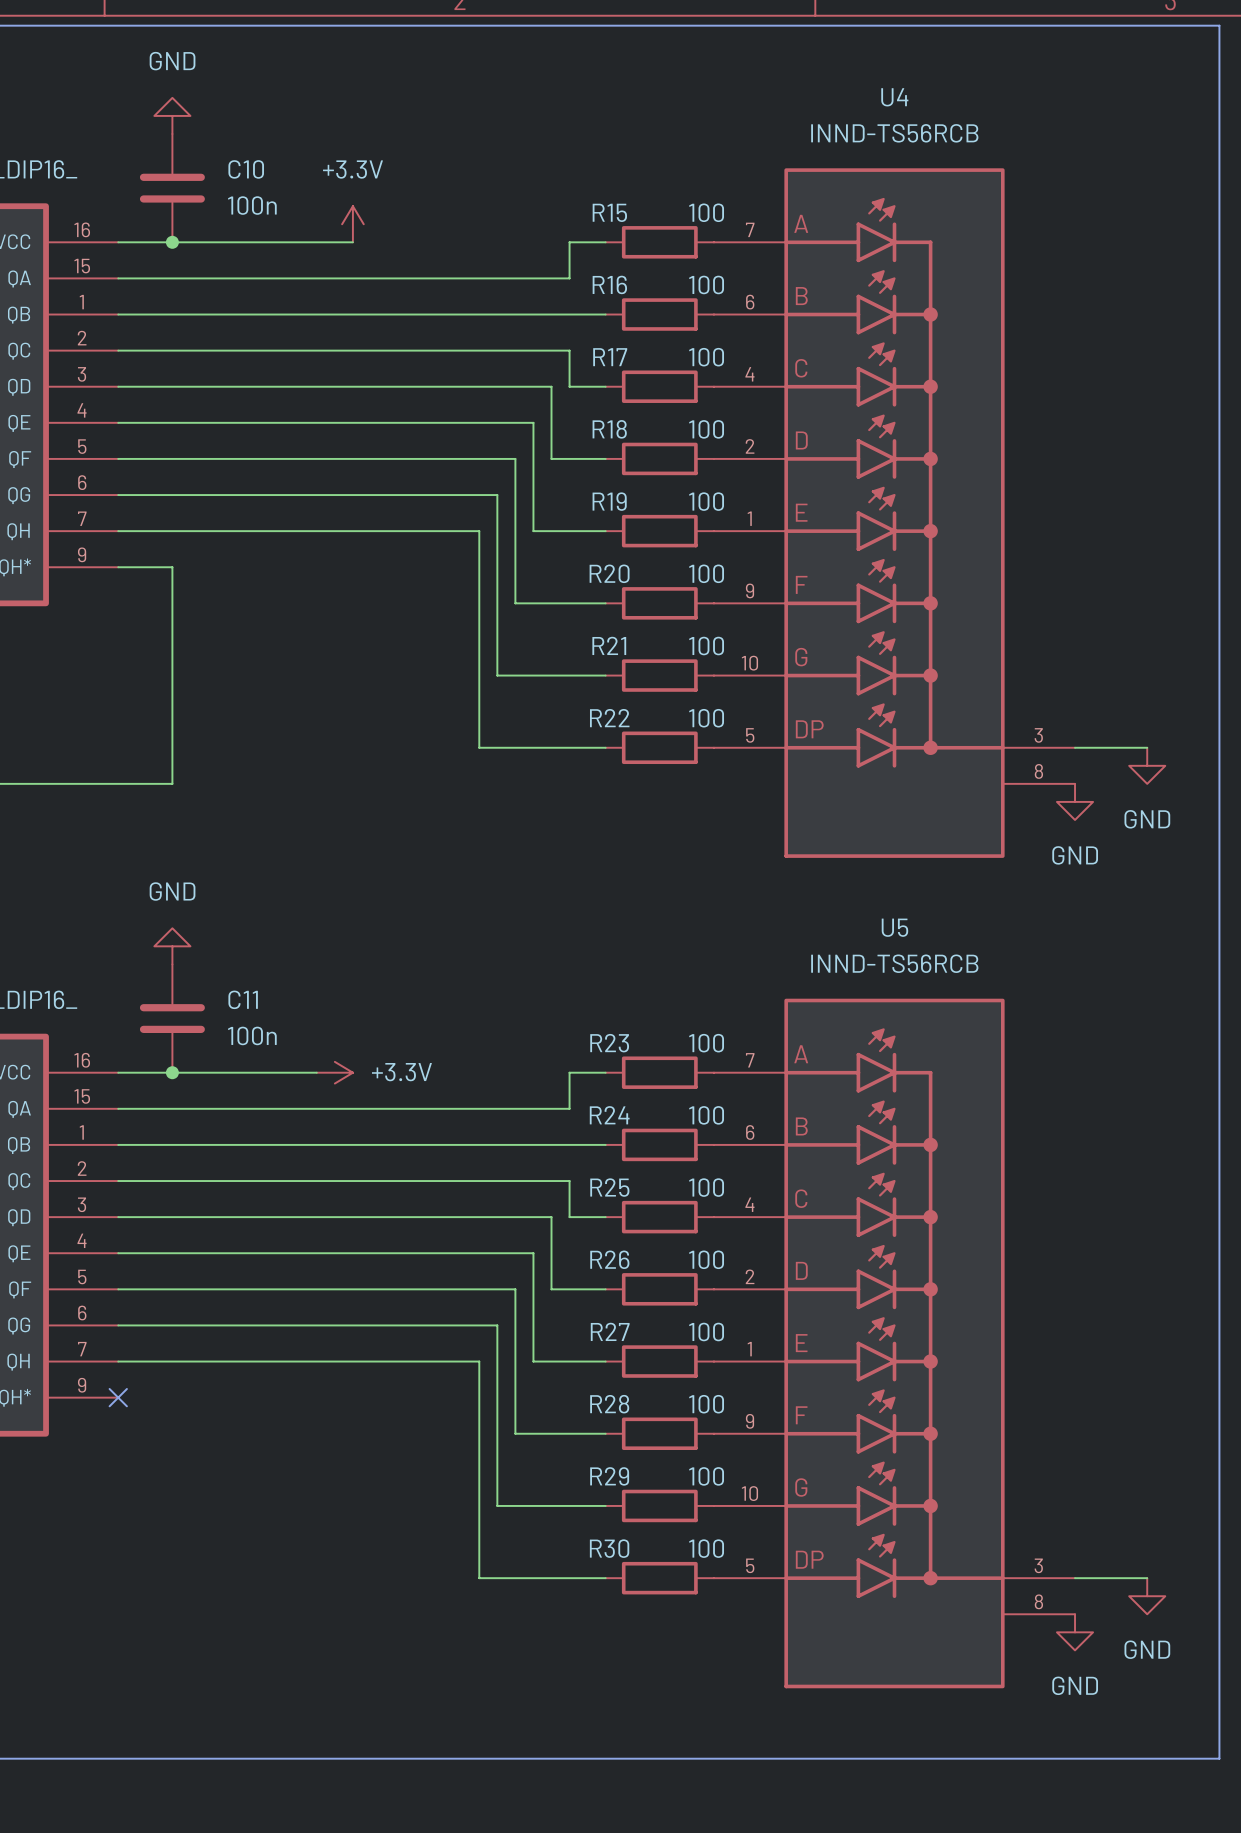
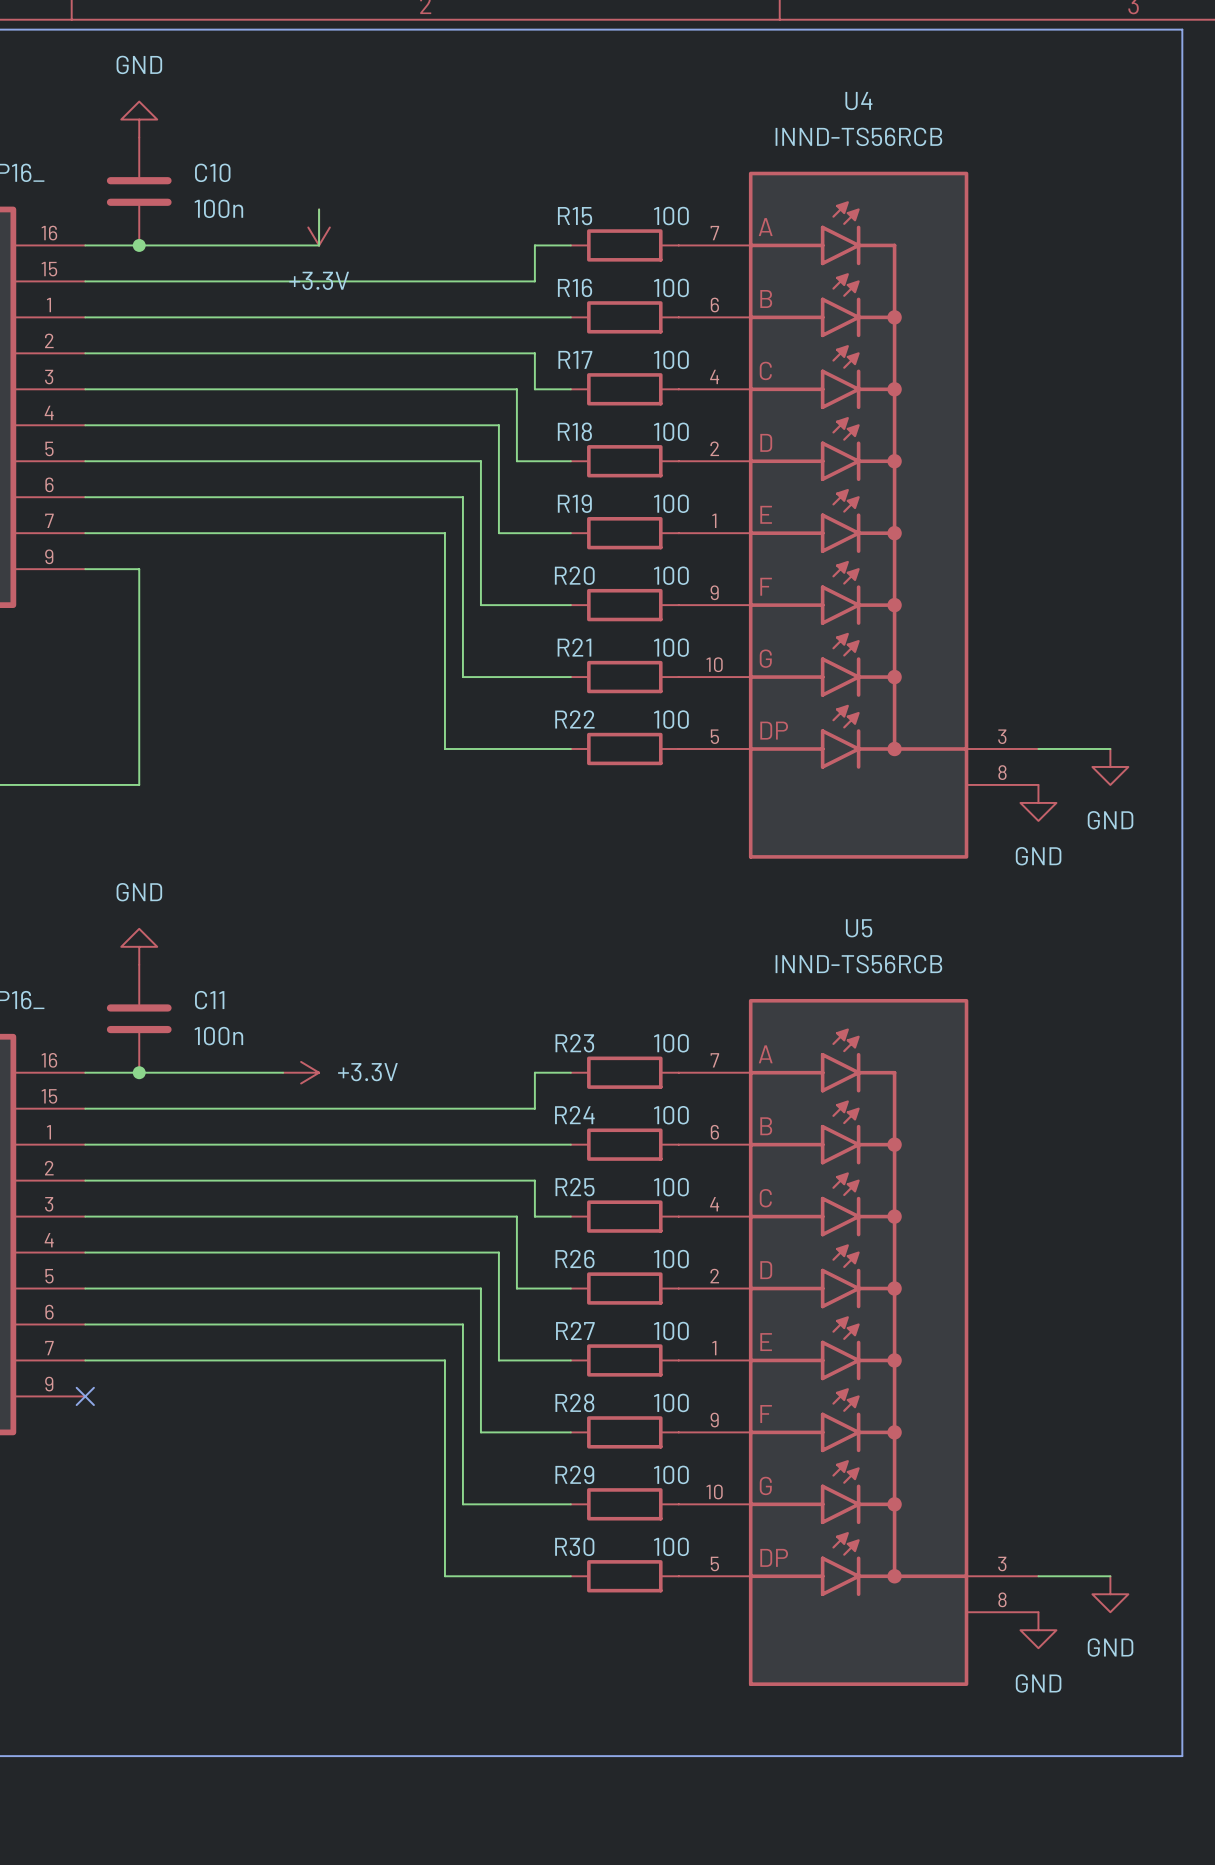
power symbol rotation: 0° (352, 224) -> 180° (319, 227)

